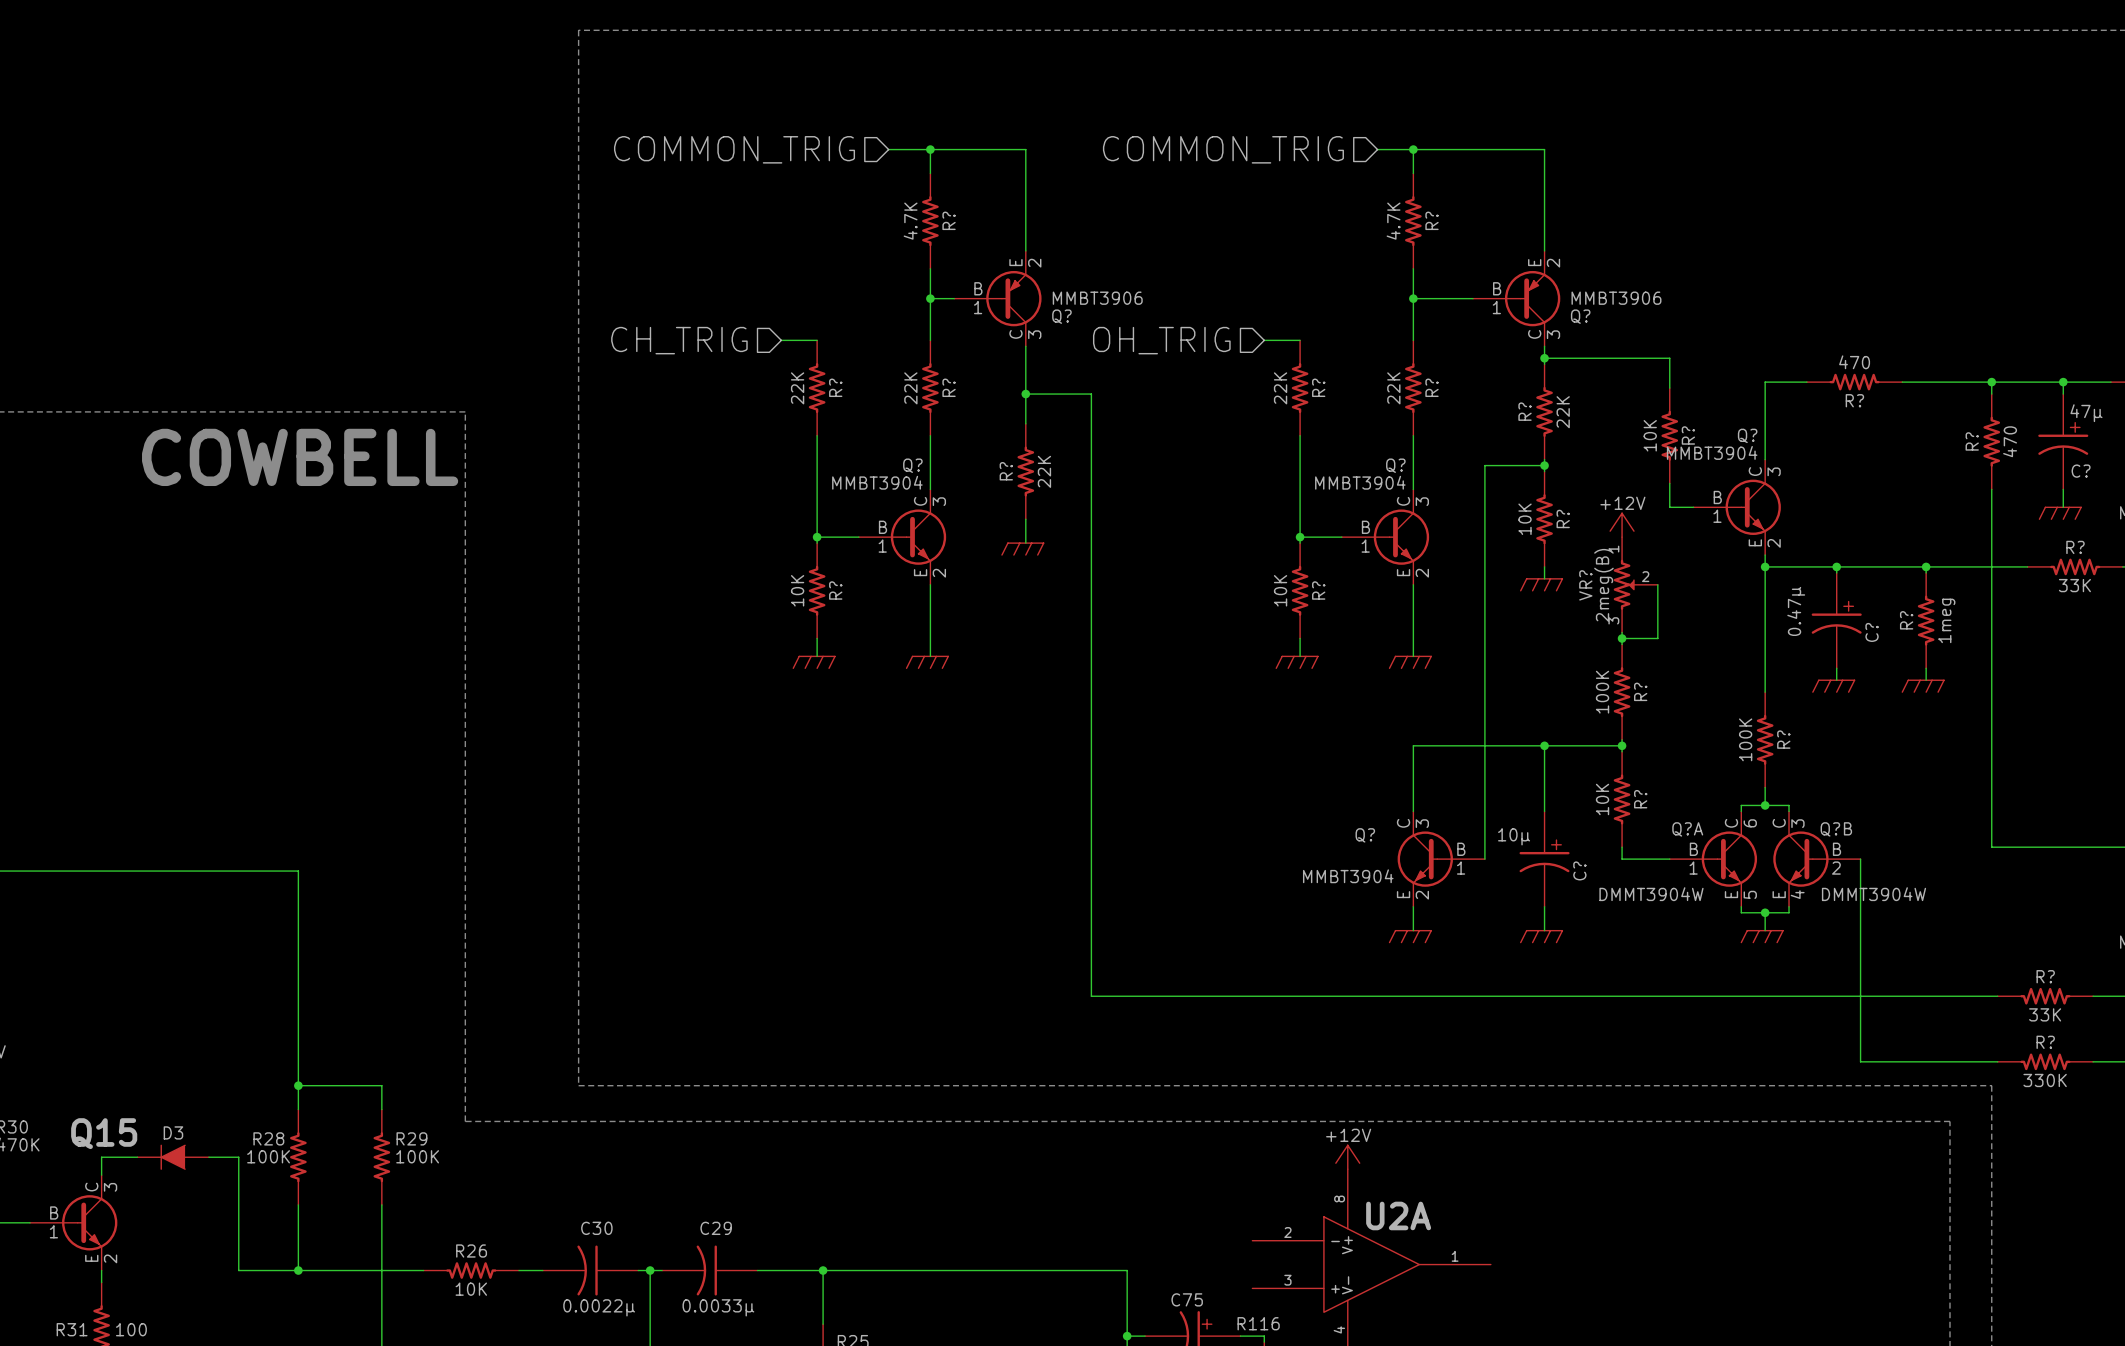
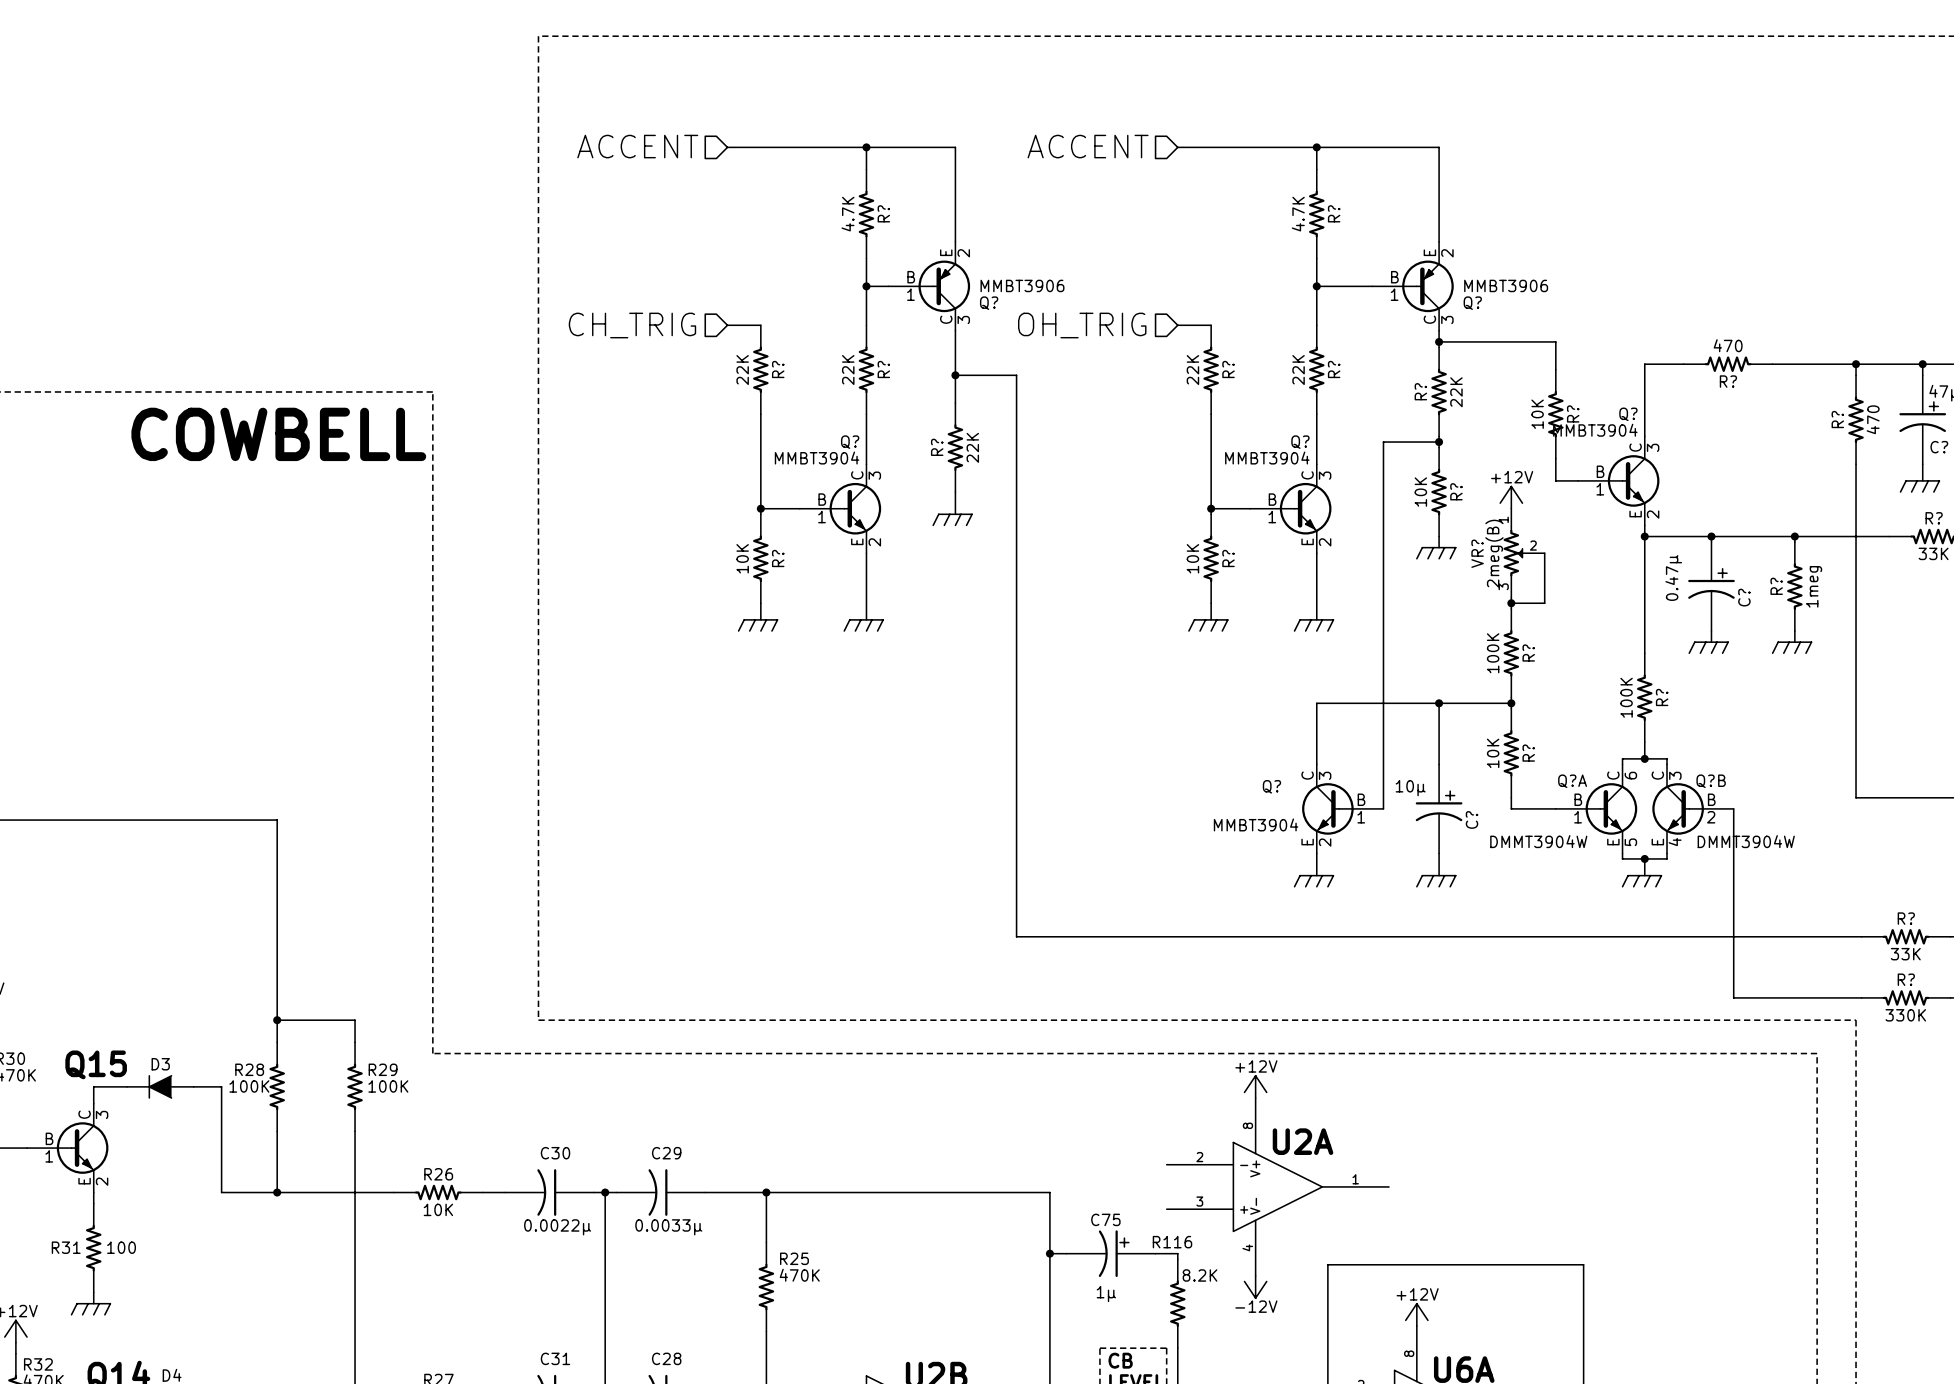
hierarchical label: none -> ACCENT (637, 146)
hierarchical label: none -> ACCENT (1088, 146)
hierarchical label: COMMON_TRIG (734, 149) -> none
wire: none -> (727, 147) (827, 147)
hierarchical label: COMMON_TRIG (1223, 149) -> none
wire: none -> (1177, 147) (1283, 147)

